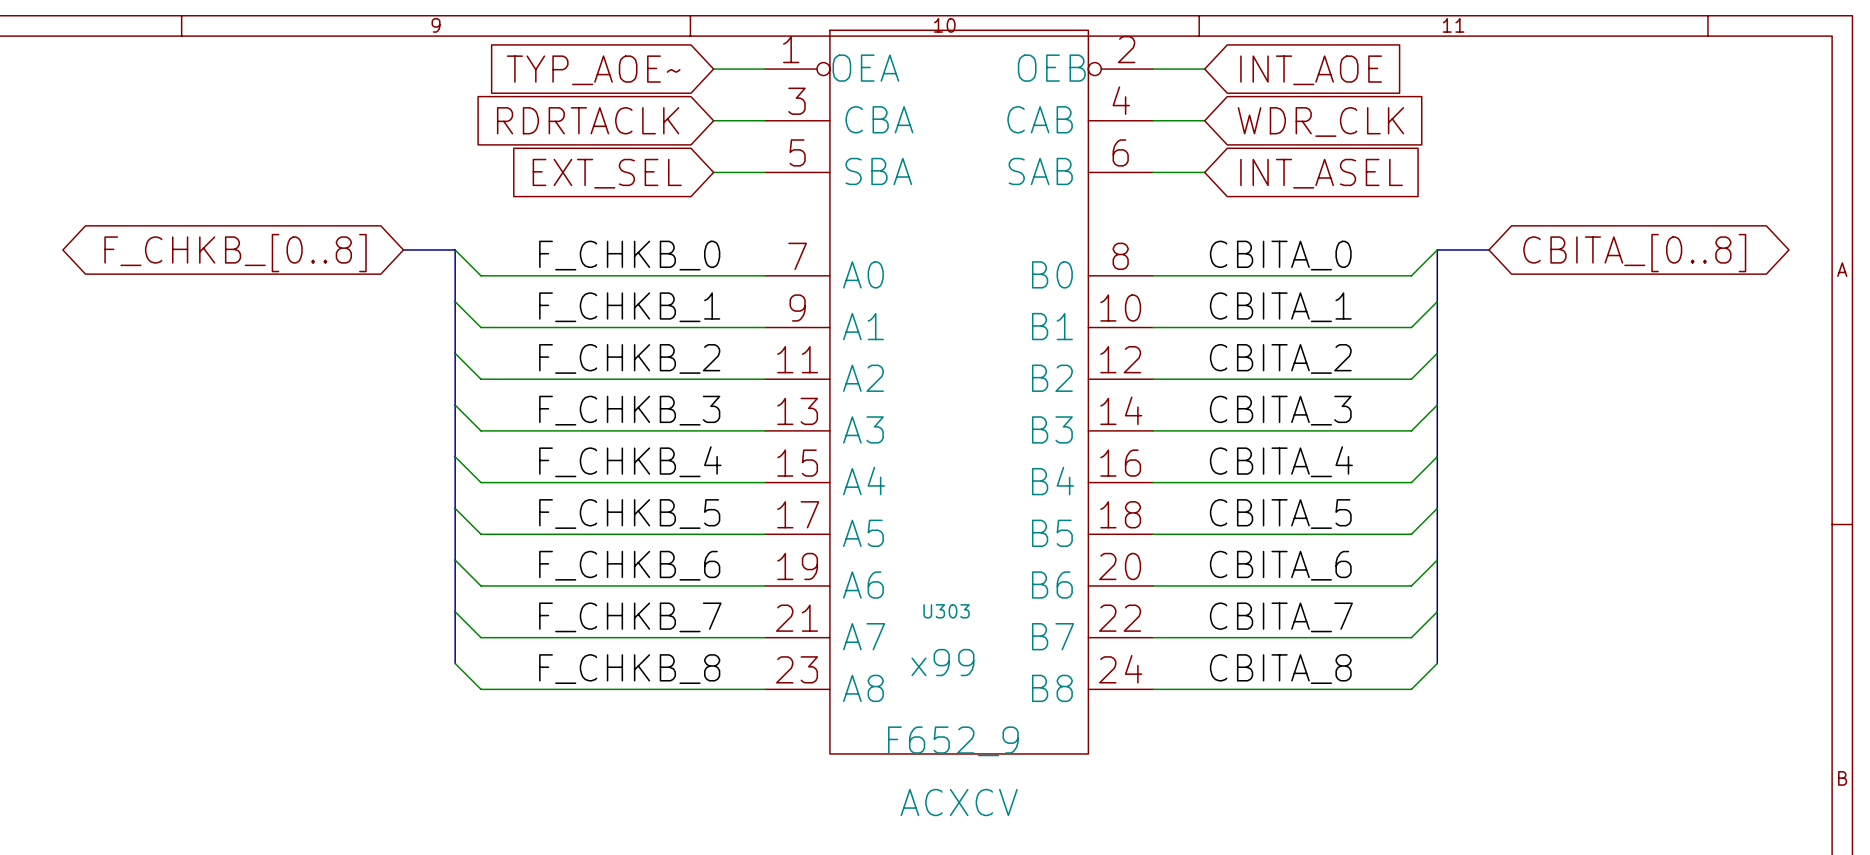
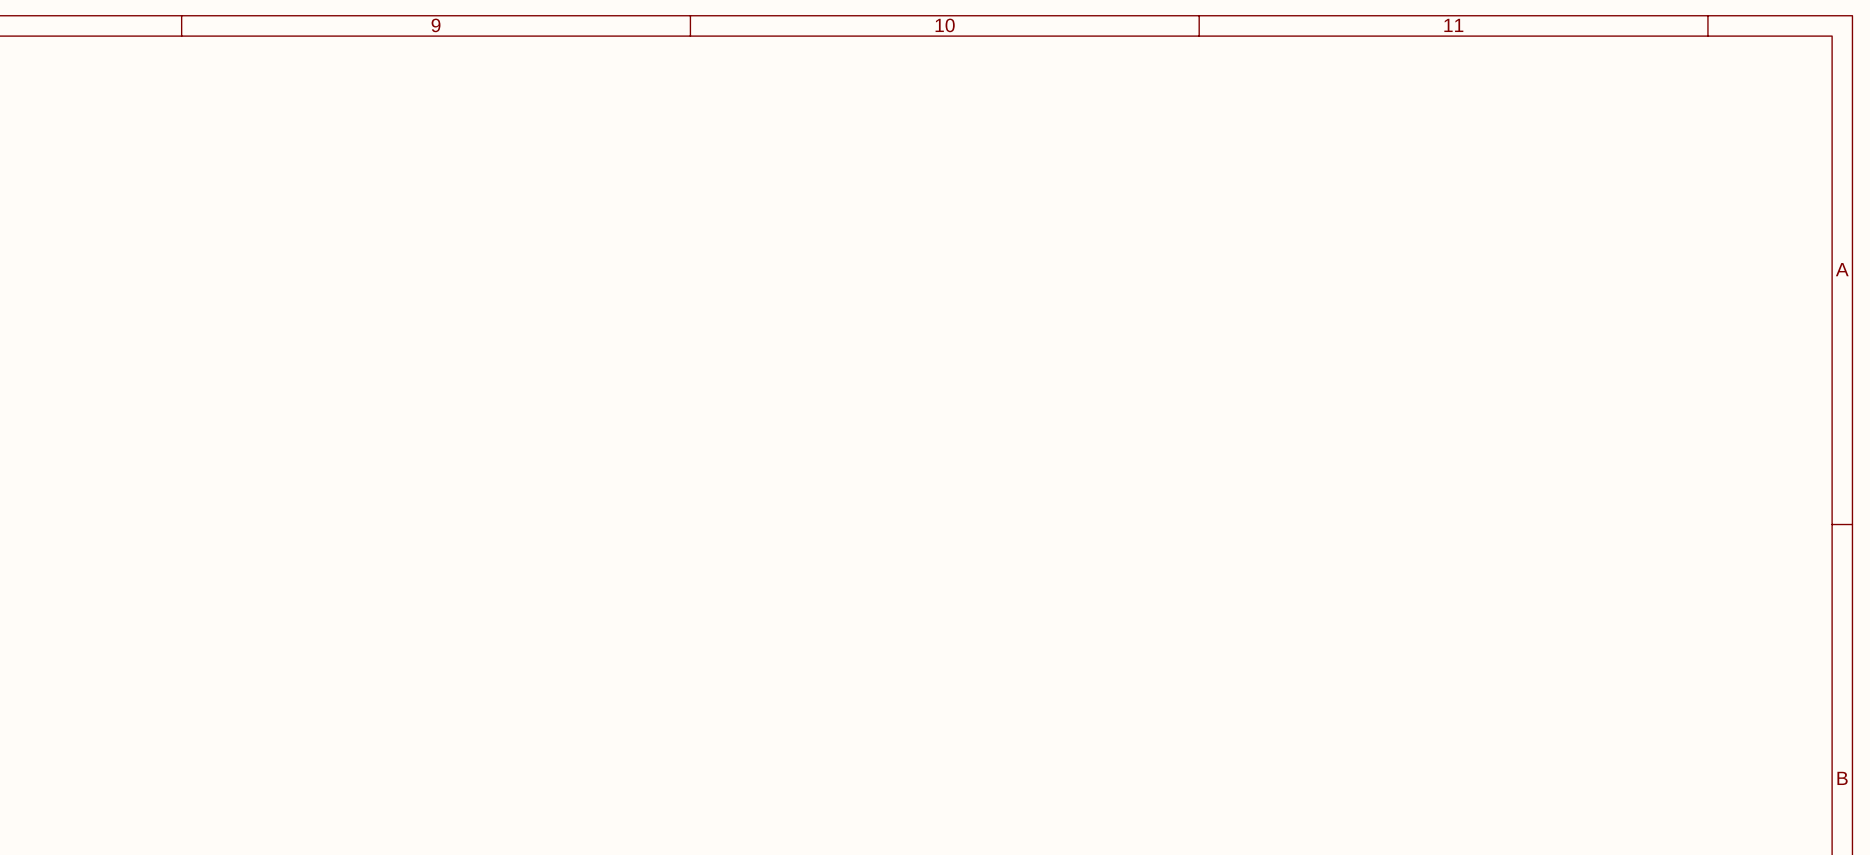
wire: (713, 69) (765, 69) -> none
wire: (1152, 69) (1204, 69) -> none
global label: TYP_AOE~ (593, 70) -> none
global label: INT_AOE (1311, 70) -> none
global label: RDRTACLK (588, 120) -> none
wire: (713, 120) (765, 120) -> none
wire: (1152, 120) (1204, 120) -> none
global label: WDR_CLK (1320, 121) -> none
wire: (713, 172) (765, 172) -> none
wire: (1152, 172) (1204, 172) -> none
global label: EXT_SEL (607, 173) -> none
global label: INT_ASEL (1321, 173) -> none
bus: (403, 249) (455, 249) (455, 663) -> none
wire: (455, 249) (481, 275) (765, 275) -> none
wire: (1437, 249) (1411, 275) (1152, 275) -> none
bus: (1488, 249) (1437, 249) (1437, 663) -> none
global label: F_CHKB_[0..8] (235, 253) -> none
global label: CBITA_[0..8] (1634, 253) -> none
label: F_CHKB_0 (629, 255) -> none
label: CBITA_0 (1280, 255) -> none
wire: (455, 301) (481, 327) (765, 327) -> none
wire: (1437, 301) (1411, 327) (1152, 327) -> none
label: F_CHKB_1 (629, 307) -> none
label: CBITA_1 (1280, 307) -> none
wire: (455, 353) (481, 379) (765, 379) -> none
wire: (1437, 353) (1411, 379) (1152, 379) -> none
label: F_CHKB_2 (629, 358) -> none
label: CBITA_2 (1280, 358) -> none
U303: F652_9 (959, 392) -> none
wire: (455, 405) (481, 430) (765, 430) -> none
wire: (1437, 405) (1411, 430) (1152, 430) -> none
label: F_CHKB_3 (629, 410) -> none
label: CBITA_3 (1280, 410) -> none
wire: (455, 456) (481, 482) (765, 482) -> none
wire: (1437, 456) (1411, 482) (1152, 482) -> none
label: F_CHKB_4 (630, 461) -> none
label: CBITA_4 (1281, 461) -> none
wire: (455, 508) (481, 534) (765, 534) -> none
wire: (1437, 508) (1411, 534) (1152, 534) -> none
label: F_CHKB_5 (629, 514) -> none
label: CBITA_5 (1280, 514) -> none
wire: (455, 560) (481, 585) (765, 585) -> none
wire: (1437, 560) (1411, 585) (1152, 585) -> none
label: F_CHKB_6 (629, 565) -> none
label: CBITA_6 (1280, 565) -> none
wire: (455, 611) (481, 637) (765, 637) -> none
wire: (1437, 611) (1411, 637) (1152, 637) -> none
label: F_CHKB_7 (630, 617) -> none
label: CBITA_7 (1281, 617) -> none
wire: (455, 663) (481, 689) (765, 689) -> none
wire: (1437, 663) (1411, 689) (1152, 689) -> none
label: F_CHKB_8 (629, 669) -> none
label: CBITA_8 (1280, 669) -> none

